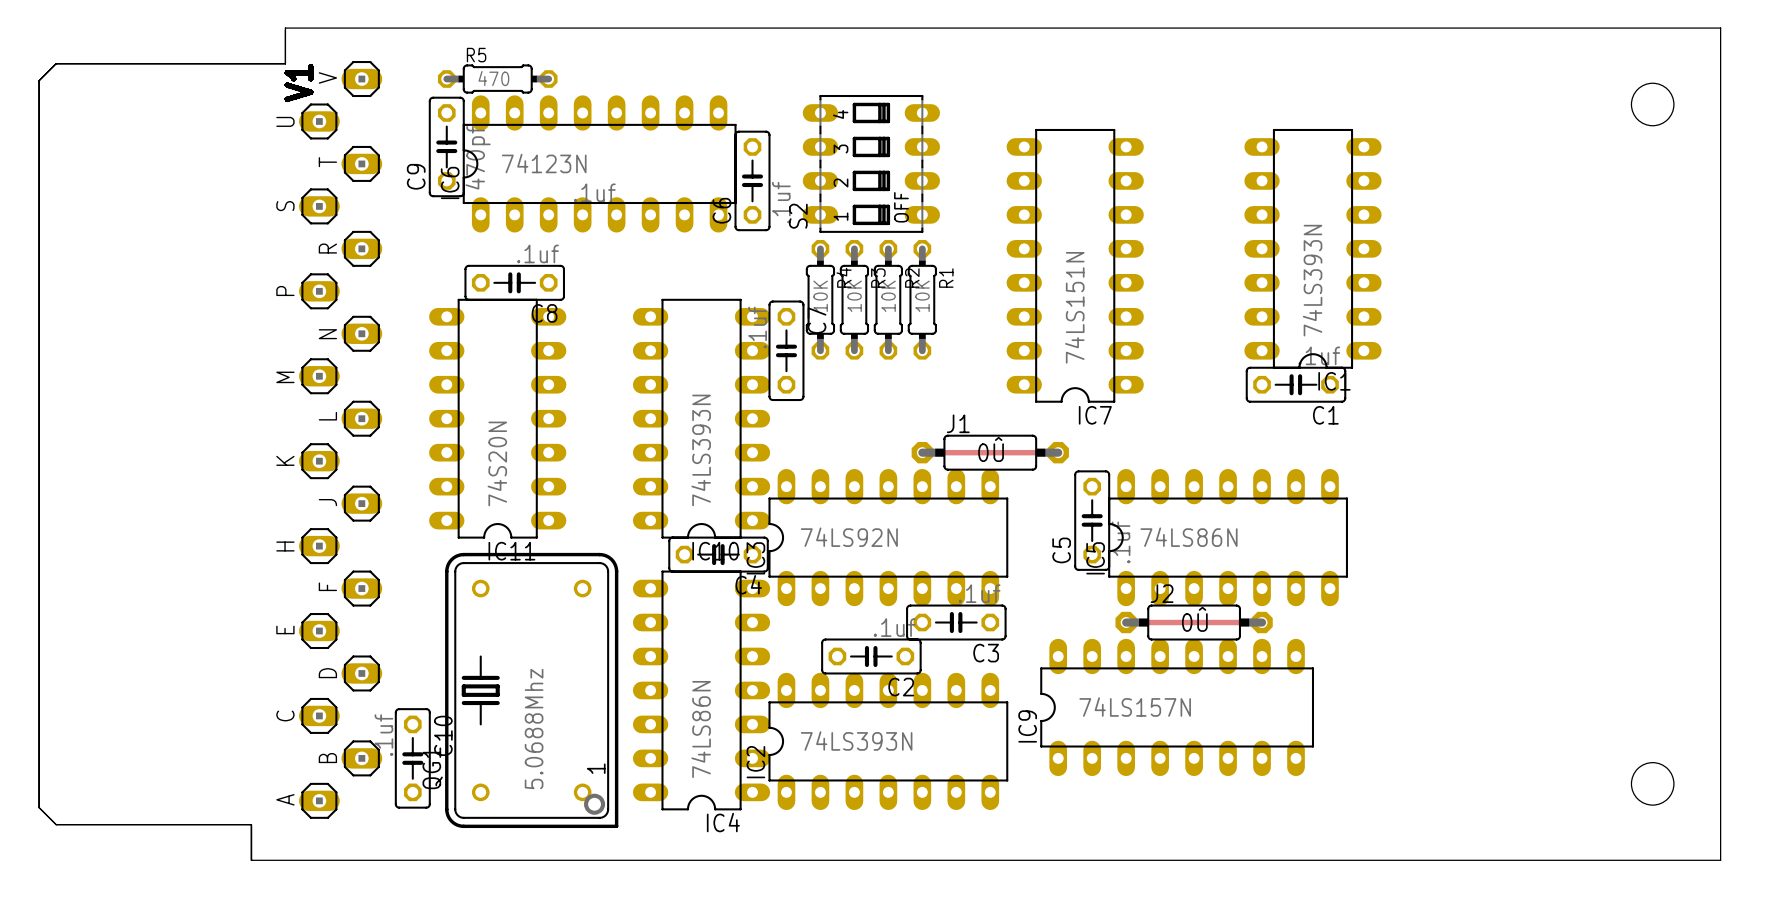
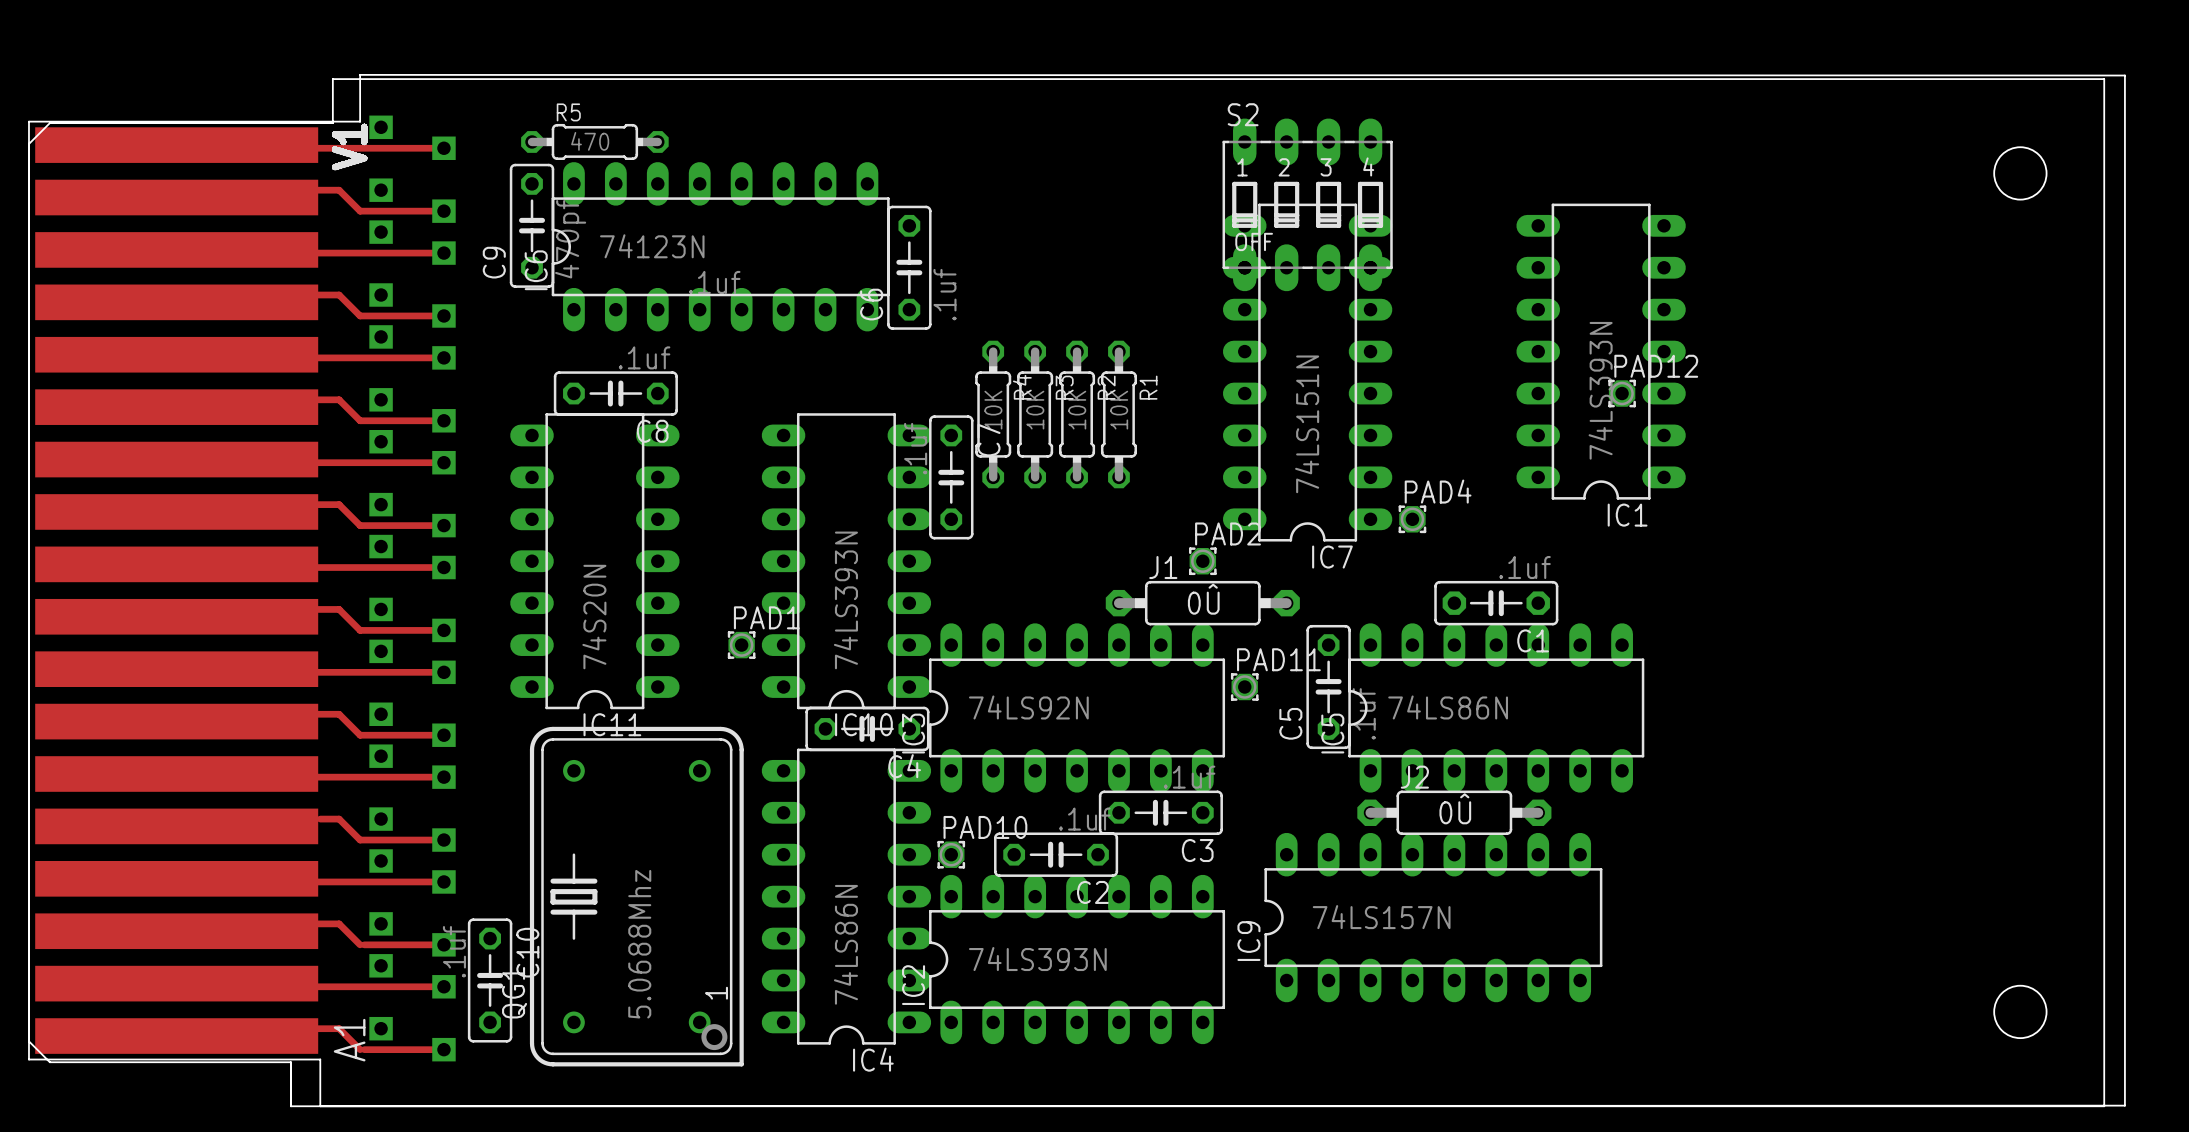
board edge: none -> (360, 74) (2124, 75) (2124, 1105) (320, 1106) (320, 1059) (28, 1059) (28, 121) (360, 121) (360, 74)
S2 footprint: [802, 94, 941, 233] -> [1222, 118, 1393, 292]
S2 name position: S2 (798, 216) -> S2 (1243, 114)
PAD12: none -> (1622, 393)
C1 footprint: [1245, 366, 1347, 403] -> [1434, 580, 1559, 626]
PAD4: none -> (1412, 519)
PAD2: none -> (1202, 561)
part: (340, 439) -> none
part: none -> (245, 588)
part: (162, 445) -> none
track: (922, 452) (1058, 452) -> none
PAD1: none -> (741, 645)
PAD11: none -> (1244, 687)
track: (1126, 622) (1262, 622) -> none
PAD10: none -> (951, 854)
text: none -> A1 (349, 1040)

